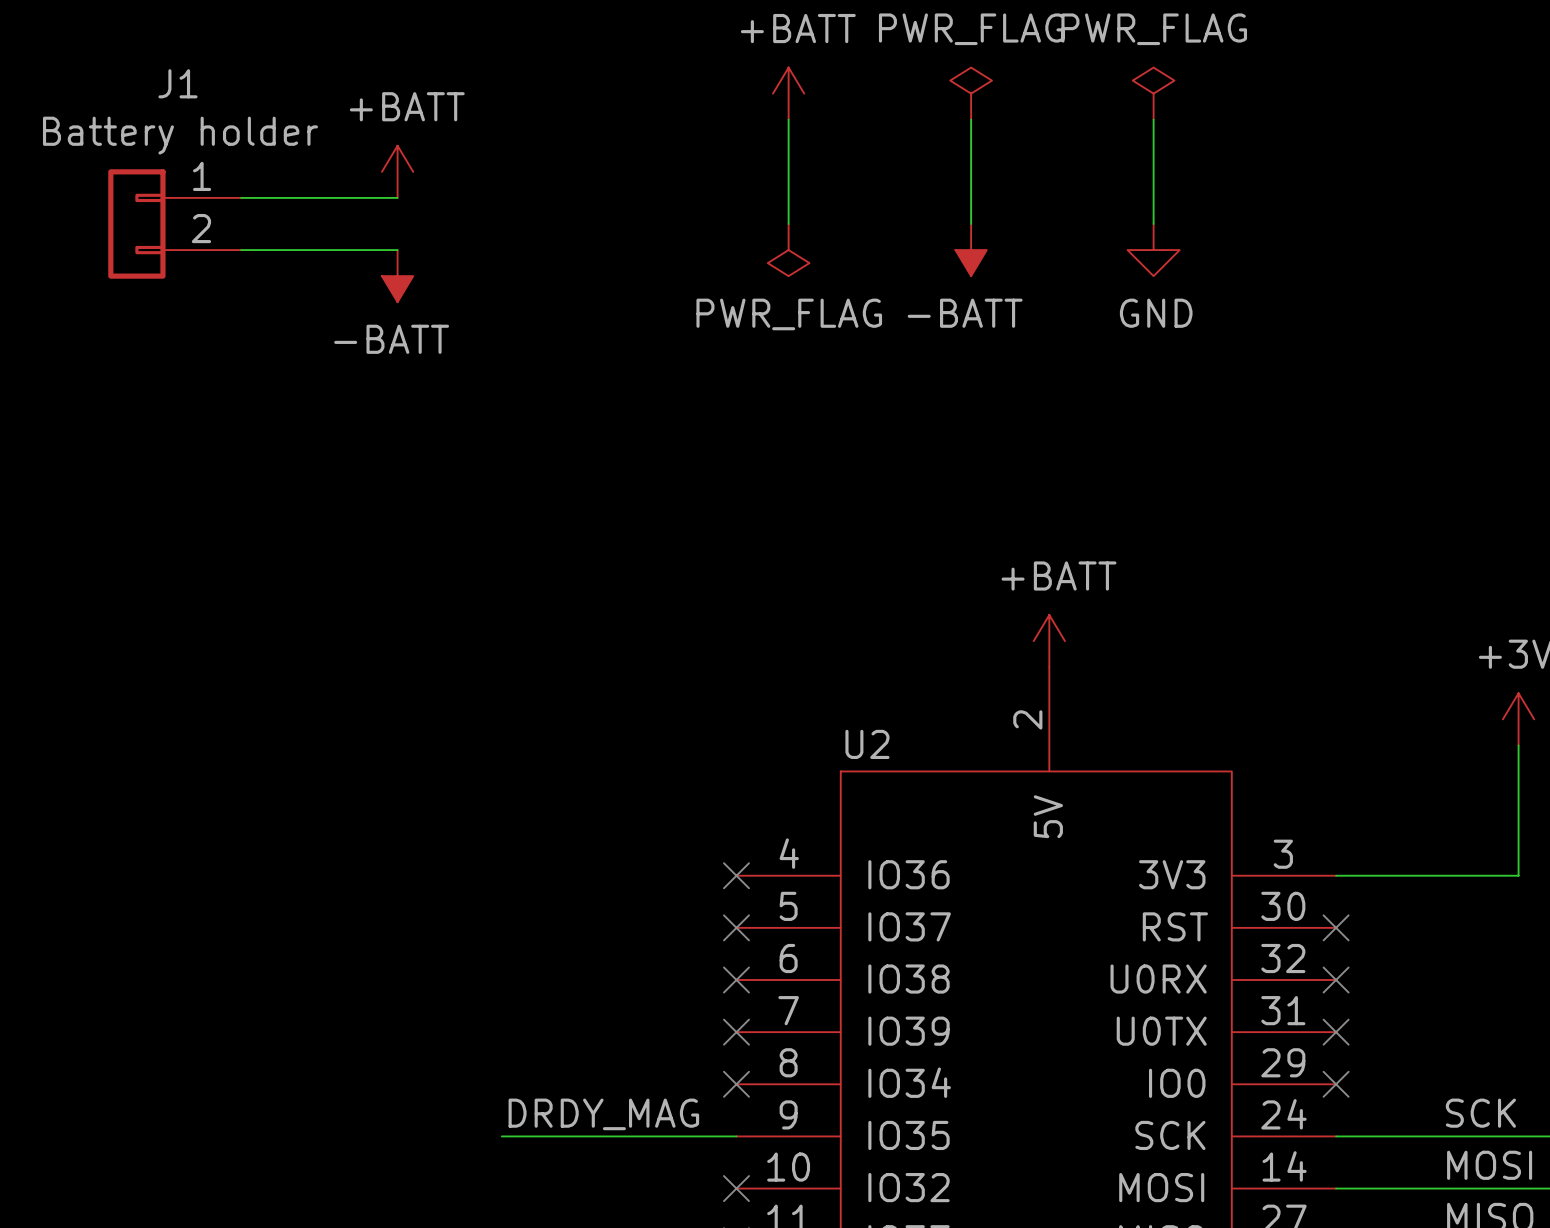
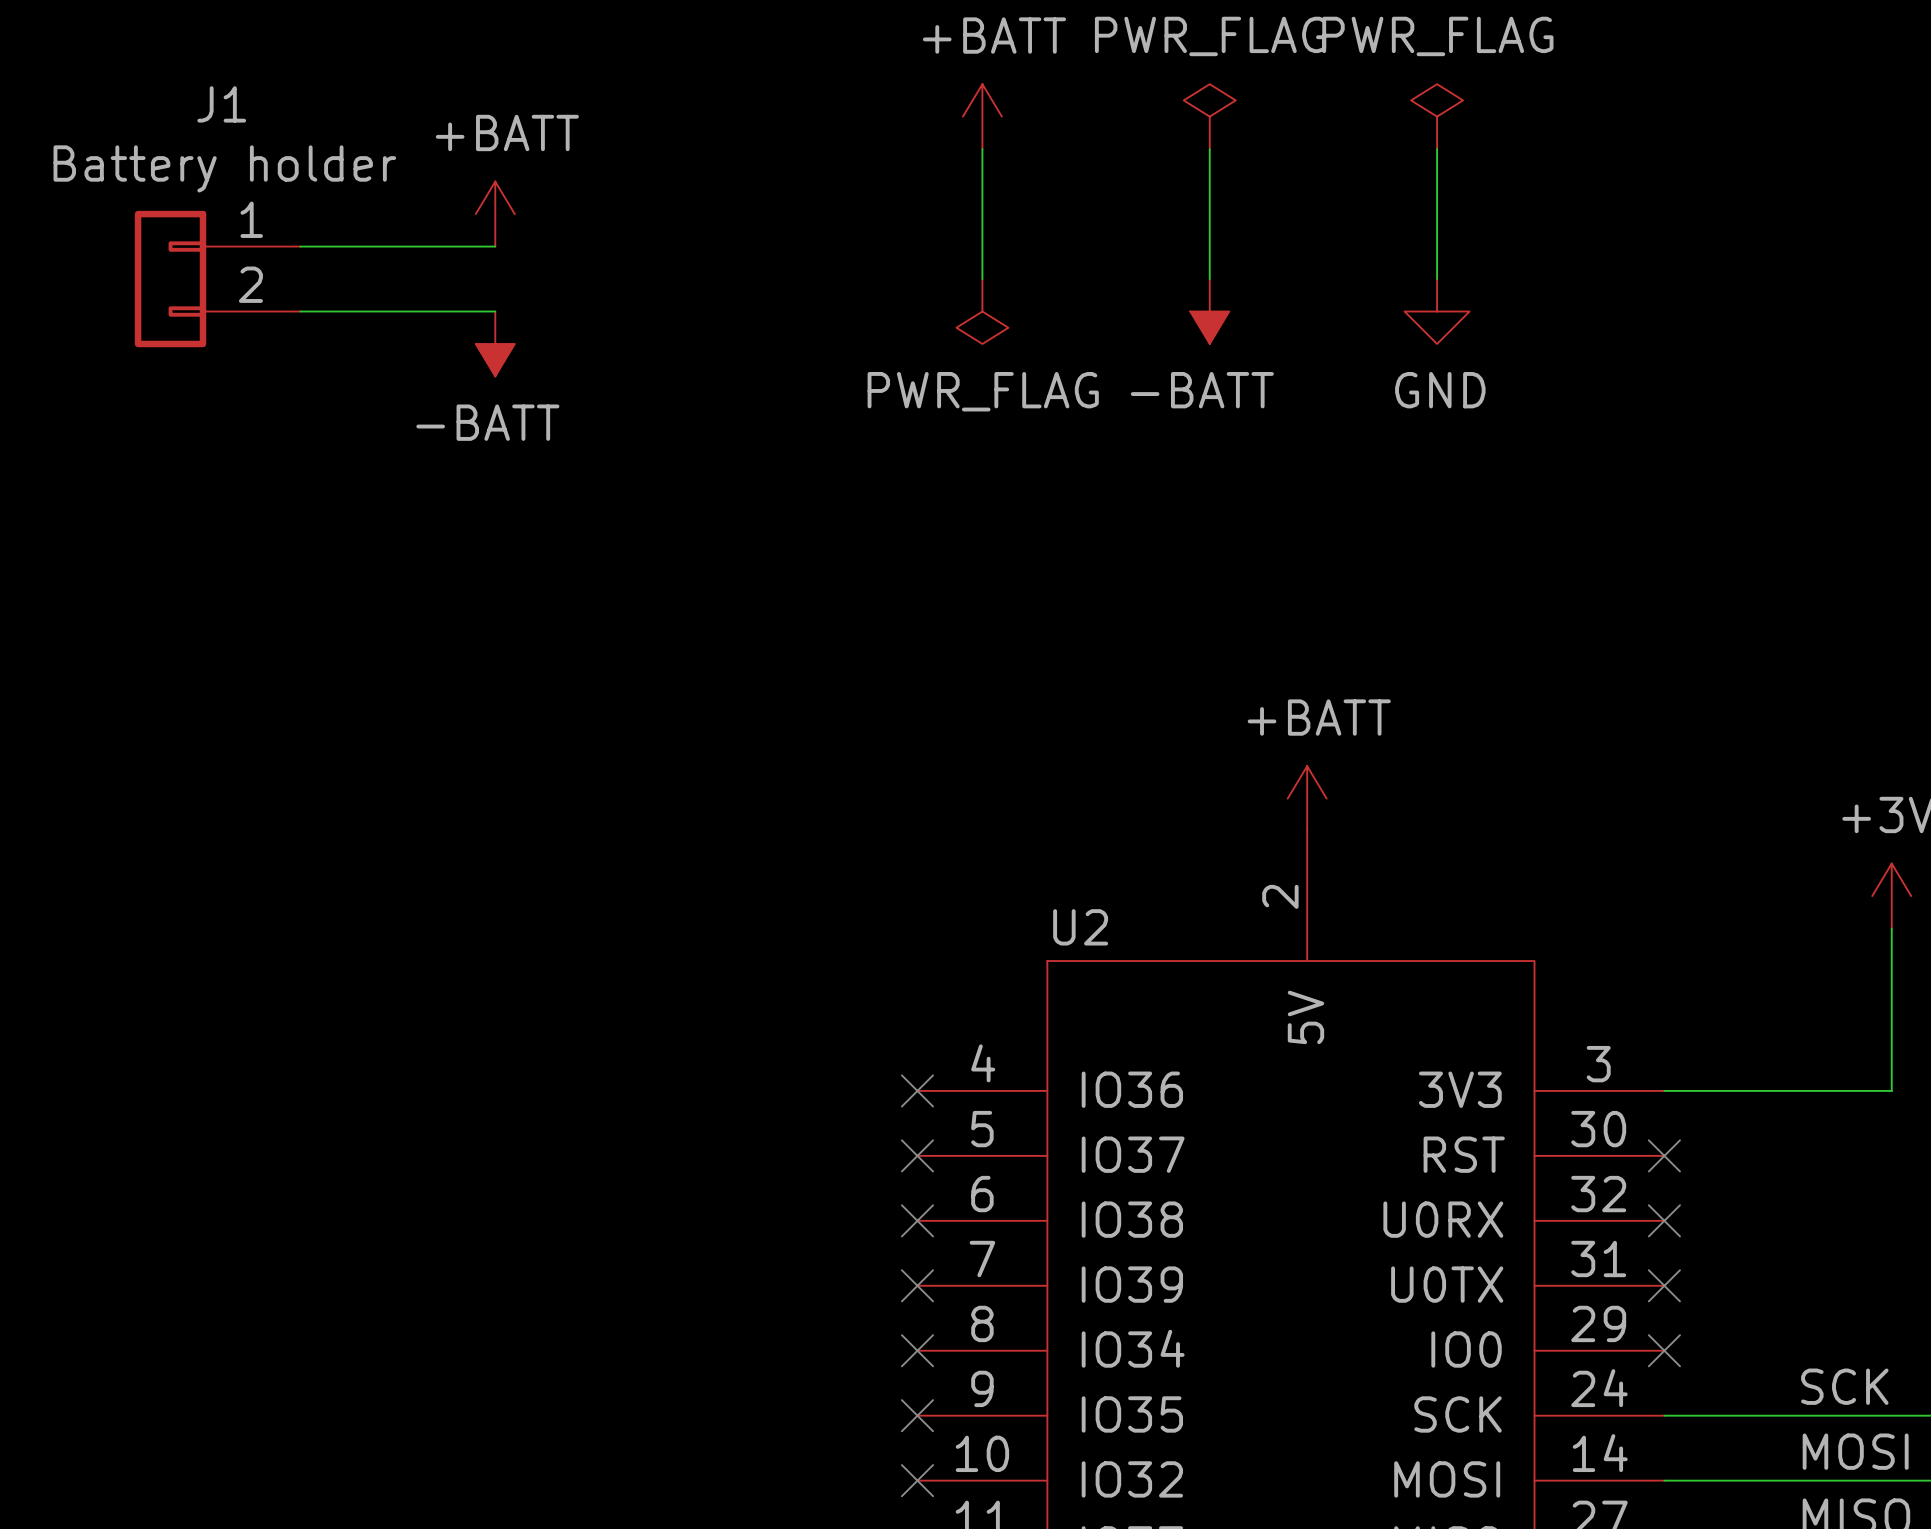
label: DRDY_MAG (603, 1114) -> none
wire: (501, 1136) (736, 1136) -> none
no-connect mark: none -> (917, 1415)

